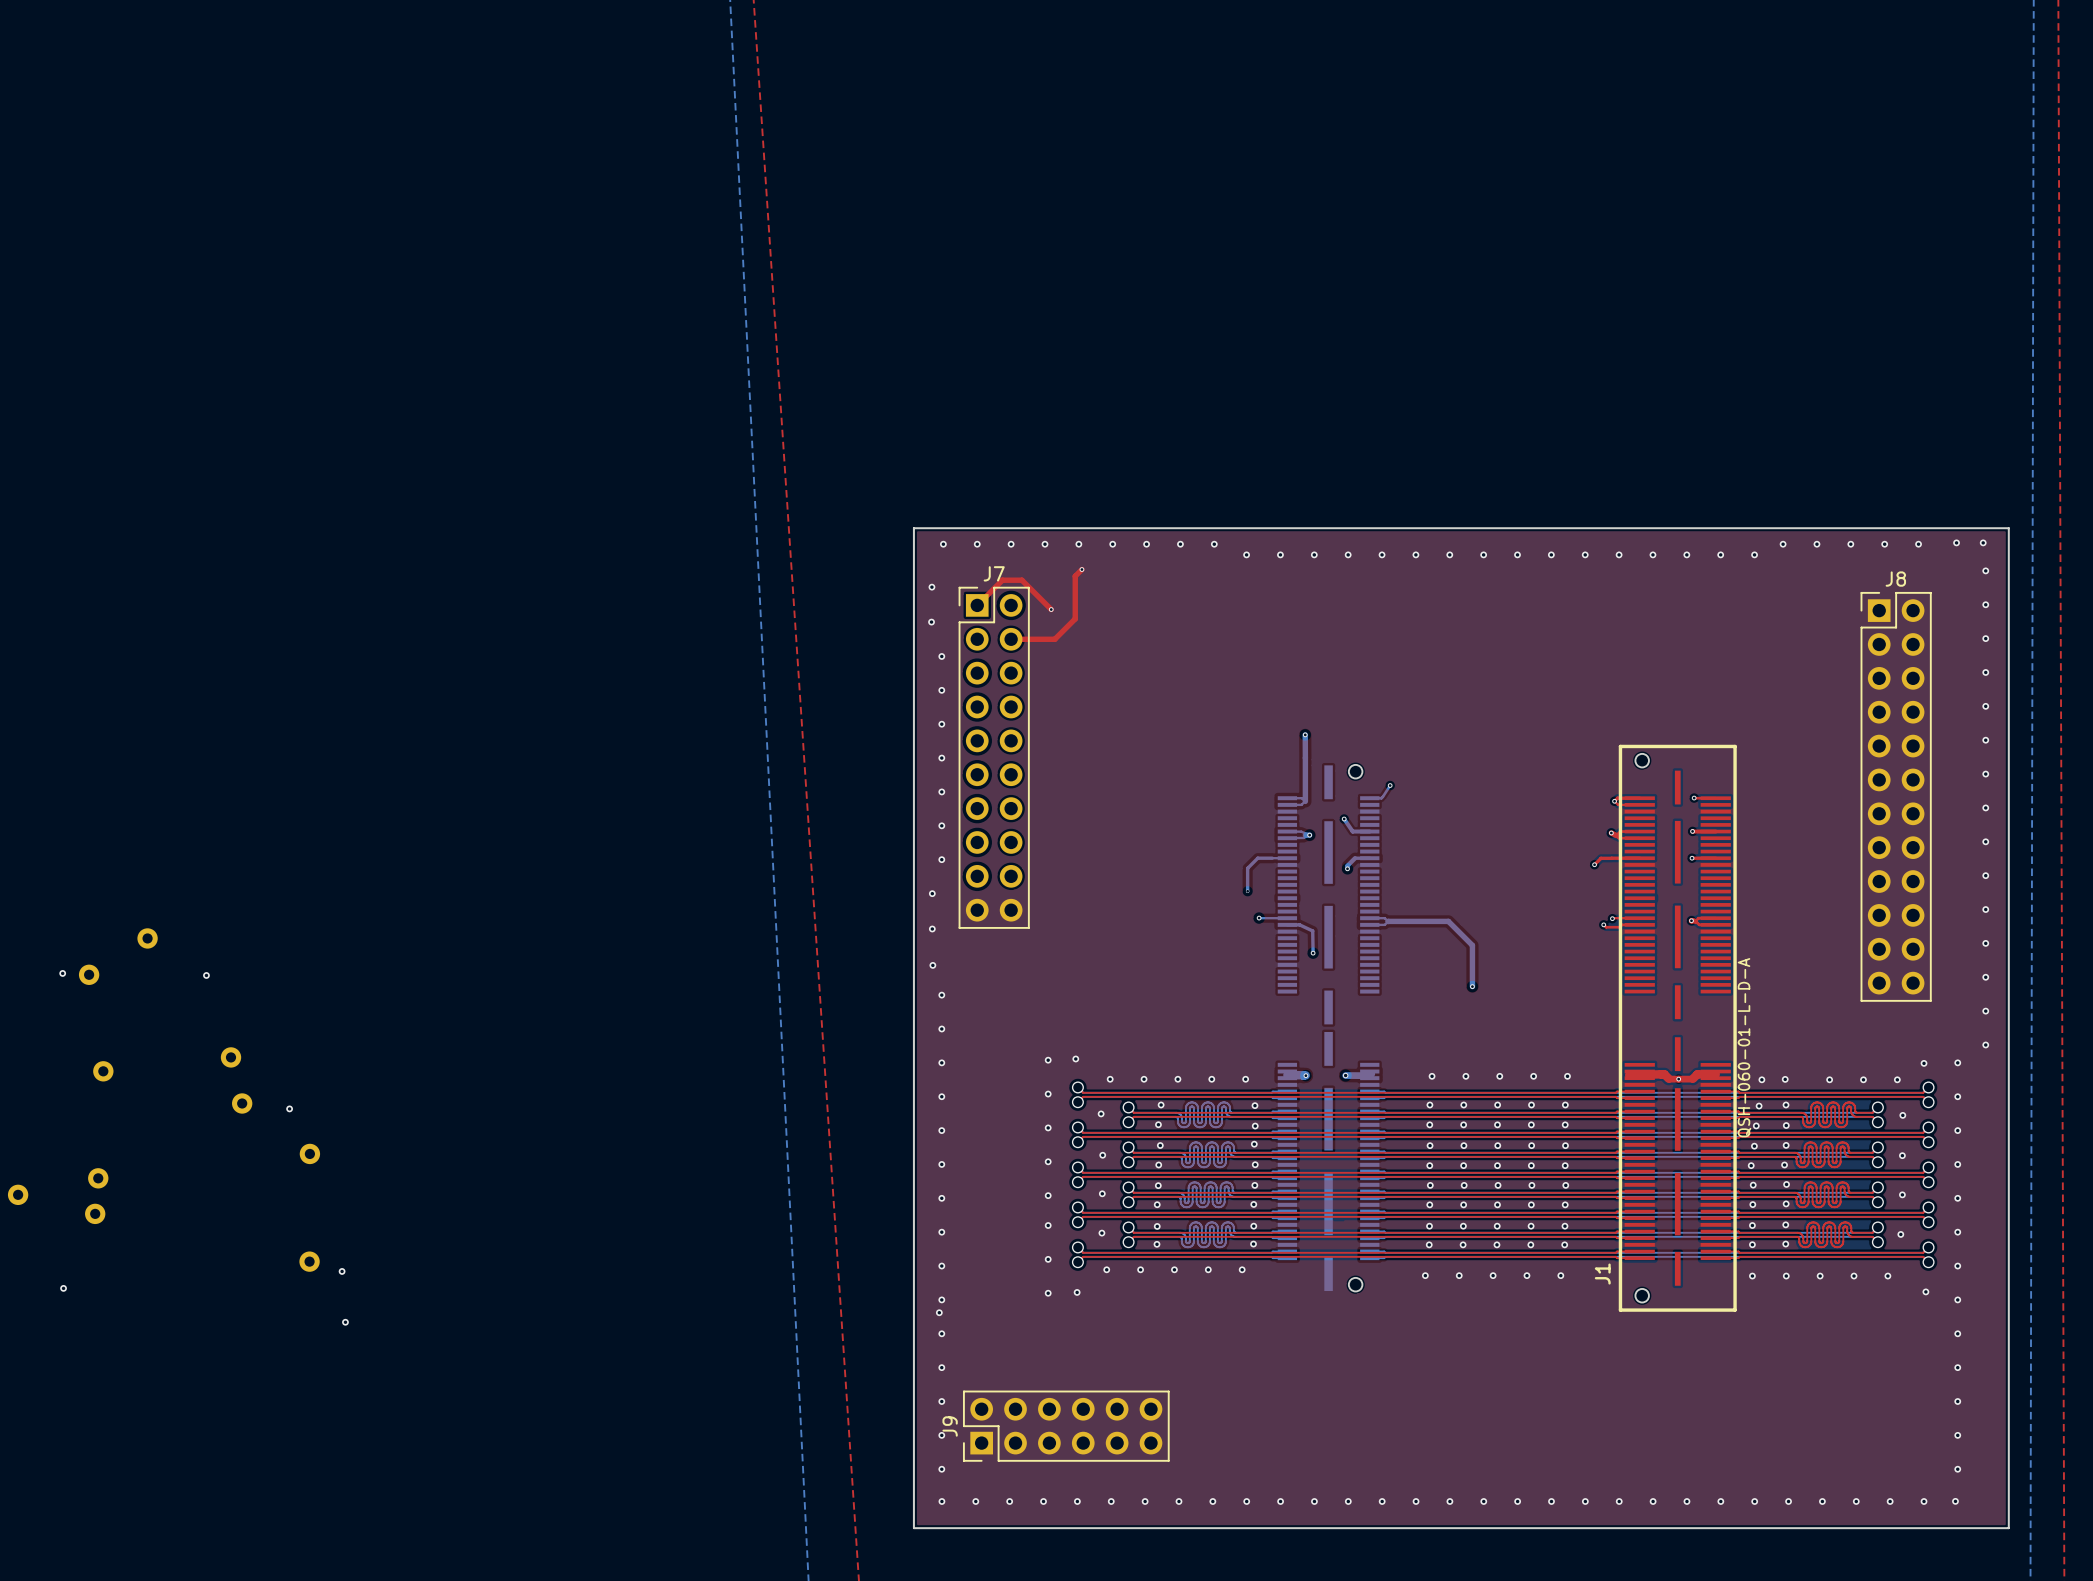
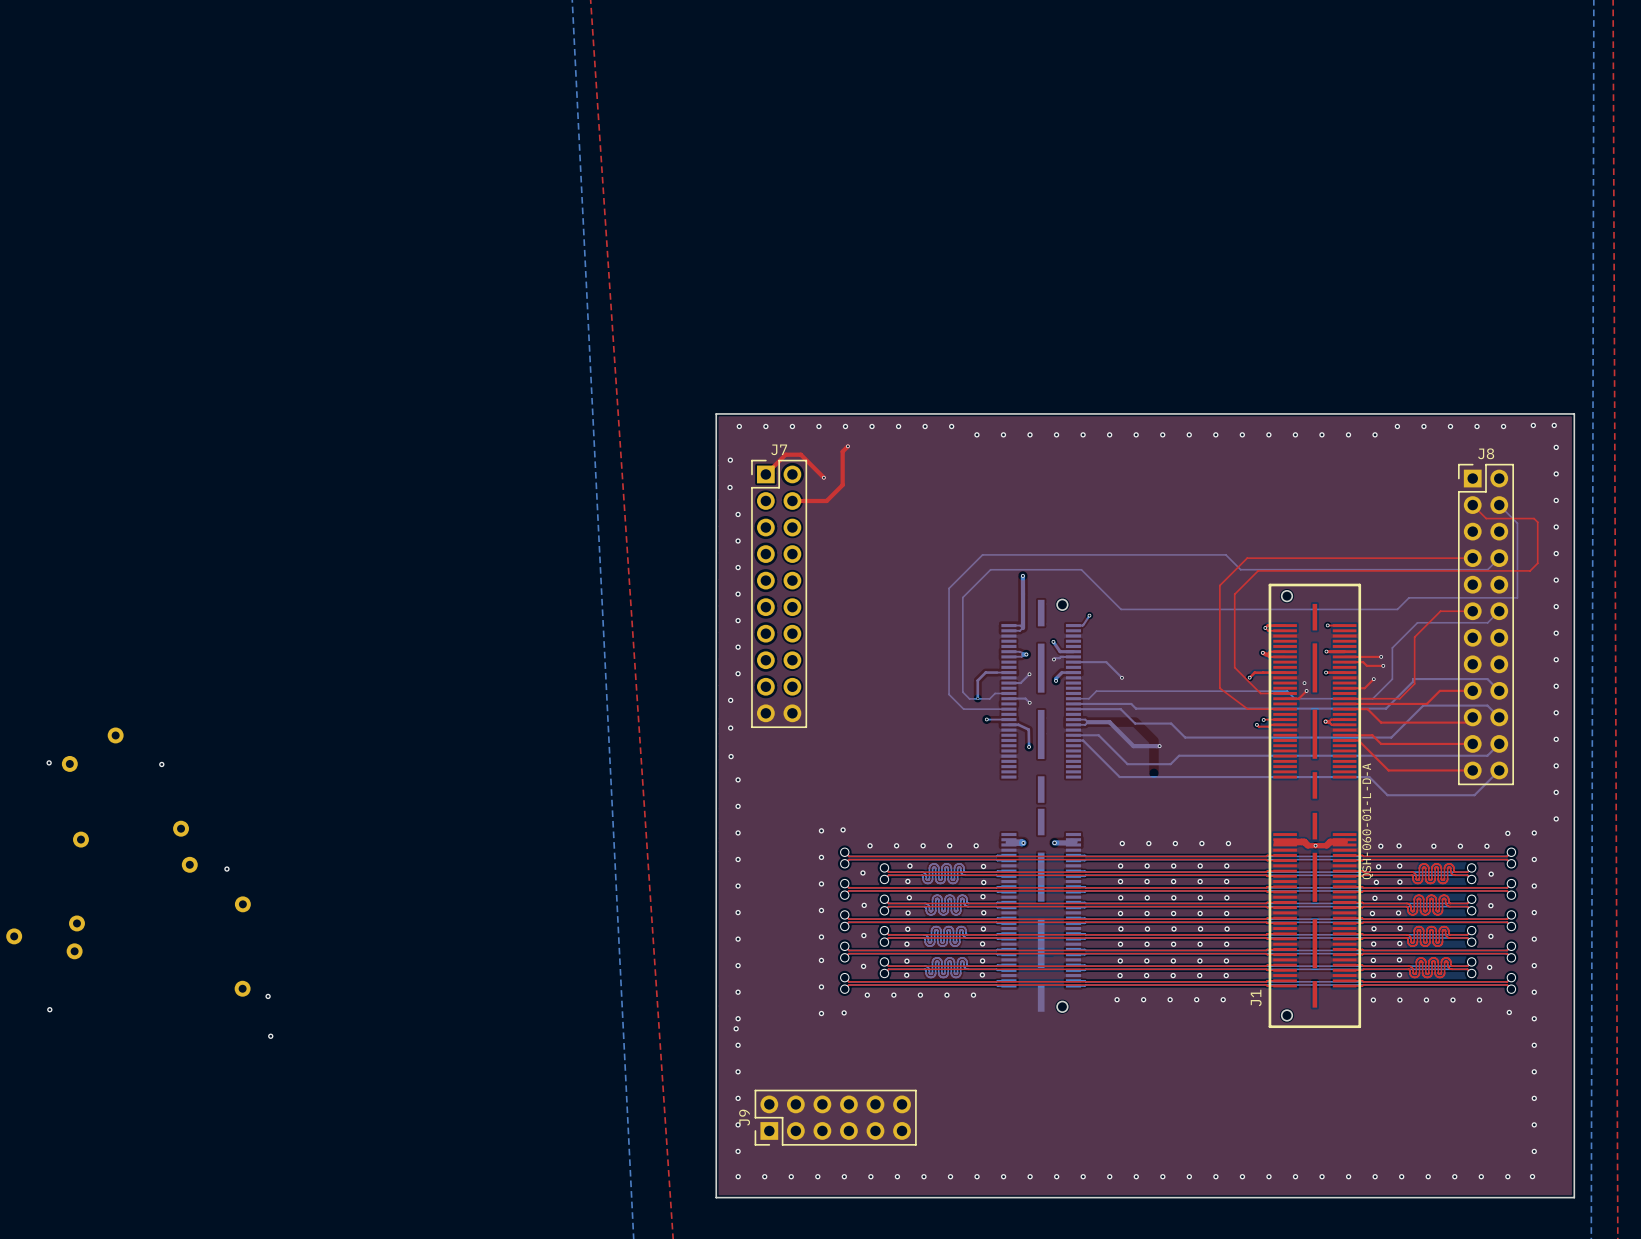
top track: none -> (1472, 505) (1486, 518) (1534, 518) (1537, 522) (1537, 563) (1530, 570) (1258, 570) (1234, 594) (1234, 667) (1260, 693) (1285, 693)
bottom track: none -> (1499, 505) (1517, 523) (1517, 597) (1409, 597) (1397, 609) (1121, 609) (1081, 569) (990, 569) (962, 597) (962, 692) (969, 698) (989, 698) (995, 693) (1008, 693)
top track: none -> (1472, 558) (1247, 558) (1219, 585) (1219, 688) (1247, 709) (1285, 709)
bottom track: none -> (1499, 558) (1487, 569) (1240, 569) (1225, 554) (982, 554) (949, 588) (949, 694) (963, 709) (1008, 709)
top track: none -> (1472, 611) (1440, 611) (1414, 637) (1414, 683) (1399, 698) (1344, 698)
bottom track: none -> (1499, 611) (1487, 622) (1417, 622) (1392, 647) (1392, 679) (1372, 698) (1294, 698) (1287, 691) (1096, 691) (1088, 698) (1073, 698)
bottom track: none -> (1073, 656) (1060, 656) (1053, 659)
top track: none -> (1344, 656) (1381, 656)
via: none -> (1381, 656)
via: none -> (1053, 659)
bottom track: none -> (1073, 662) (1106, 662) (1121, 677)
top track: none -> (1344, 662) (1363, 662) (1366, 665) (1383, 665)
via: none -> (1383, 665)
bottom track: none -> (1029, 674) (1020, 683) (1008, 683)
via: none -> (1029, 674)
via: none -> (1121, 677)
top track: none -> (1373, 679) (1364, 688) (1344, 688)
via: none -> (1373, 679)
via: none -> (1304, 683)
top track: none -> (1306, 690) (1298, 698) (1285, 698)
via: none -> (1306, 690)
top track: none -> (1472, 690) (1439, 690) (1426, 703) (1344, 703)
bottom track: none -> (1499, 690) (1487, 679) (1413, 679) (1413, 681) (1386, 708) (1135, 708) (1131, 703) (1073, 703)
bottom track: none -> (1009, 698) (1025, 698) (1029, 702)
via: none -> (1029, 702)
bottom track: none -> (1073, 709) (1120, 709) (1135, 723) (1171, 723) (1185, 737) (1391, 737) (1423, 705) (1487, 705) (1499, 717)
top track: none -> (1344, 709) (1367, 709) (1381, 722) (1467, 722) (1472, 717)
bottom track: (1388, 921) (1448, 921) (1472, 945) (1472, 986) -> (1087, 722) (1109, 722) (1133, 746) (1159, 746)
bottom track: none -> (1073, 735) (1098, 735) (1127, 764) (1170, 764) (1179, 755) (1487, 755) (1499, 743)
top track: none -> (1344, 735) (1372, 735) (1381, 743) (1472, 743)
bottom track: none -> (1073, 740) (1083, 740) (1119, 777) (1369, 777) (1387, 795) (1474, 795) (1499, 770)
top track: none -> (1344, 740) (1358, 740) (1388, 770) (1472, 770)
via position: (1472, 986) -> (1159, 746)

